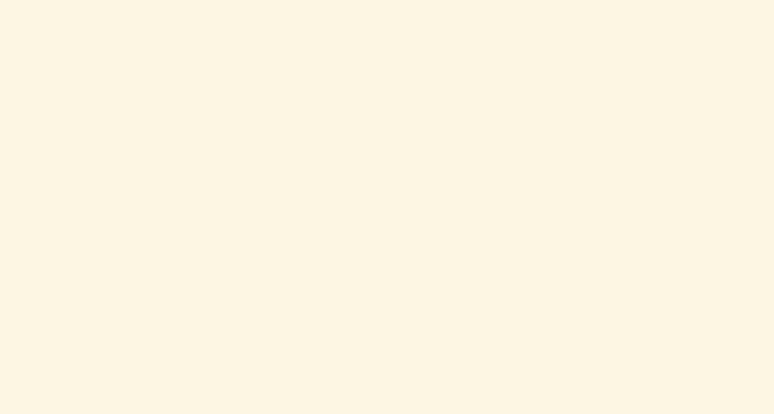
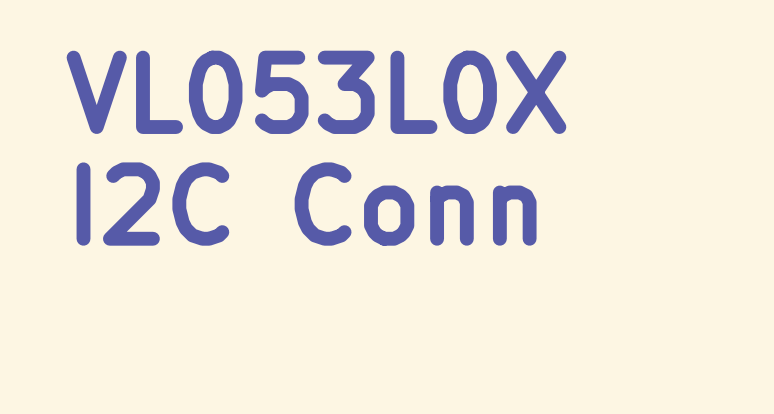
text: none -> VL053L0X (316, 92)
text: none -> I2C Conn (306, 204)

